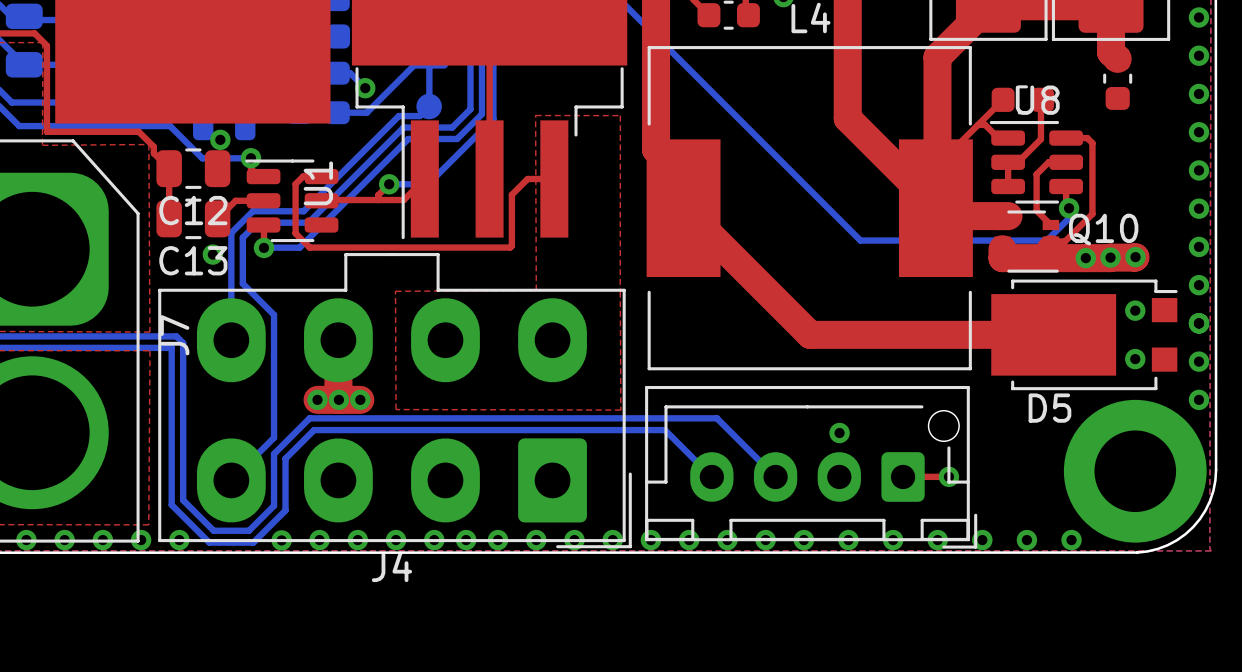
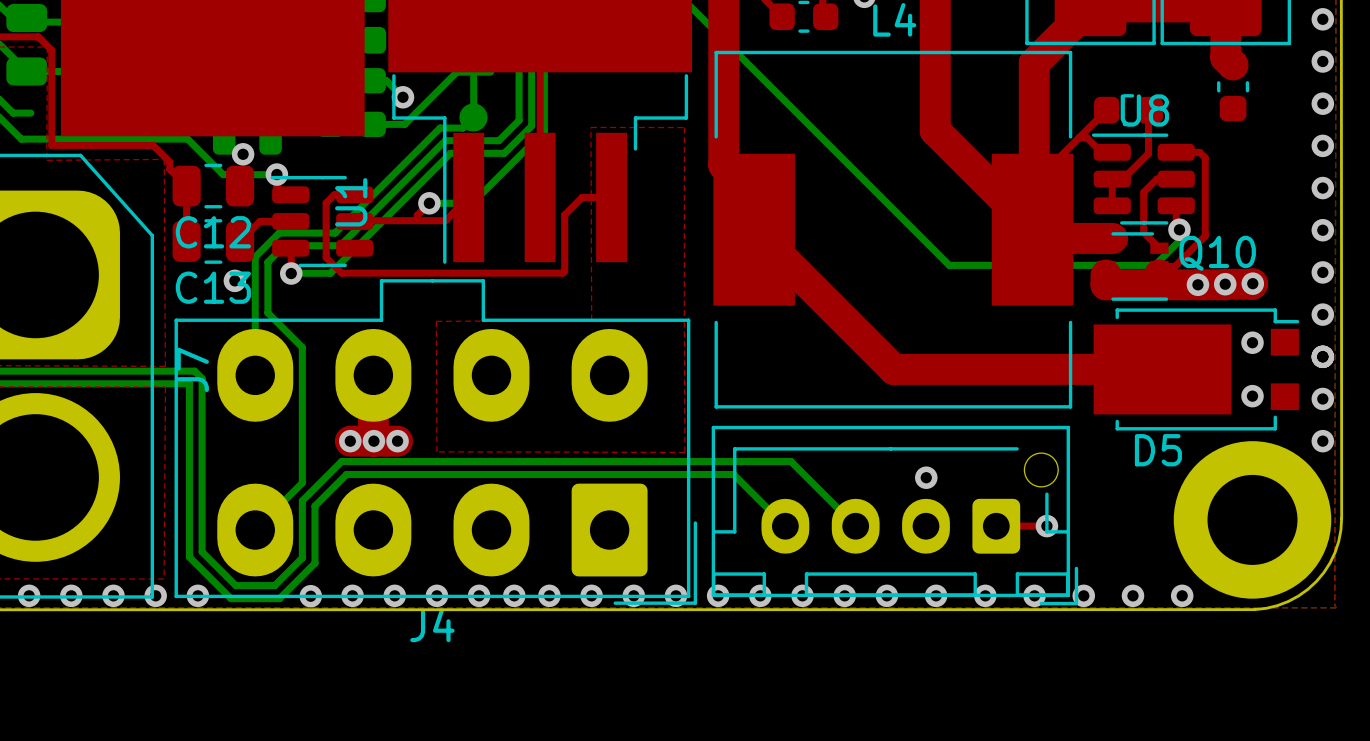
bottom track: (27, 102) (70, 102) -> none

